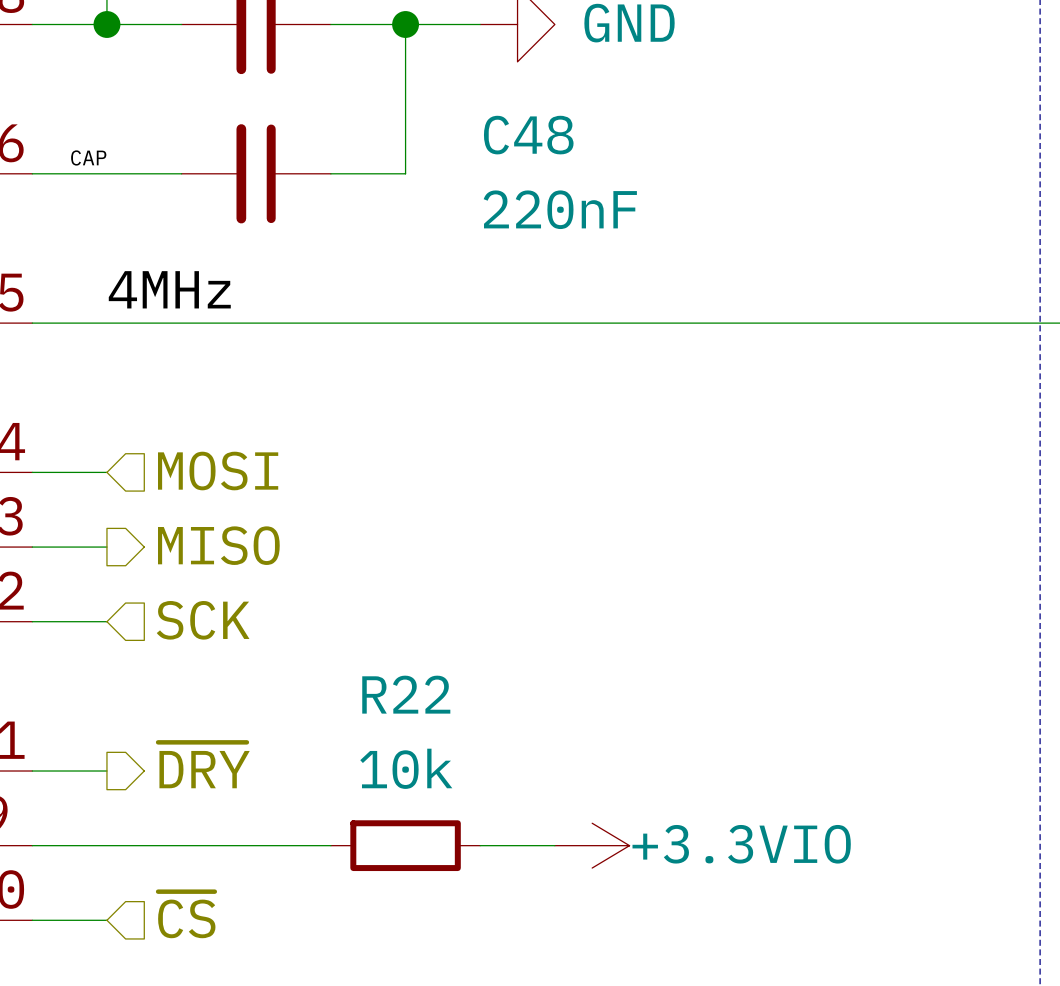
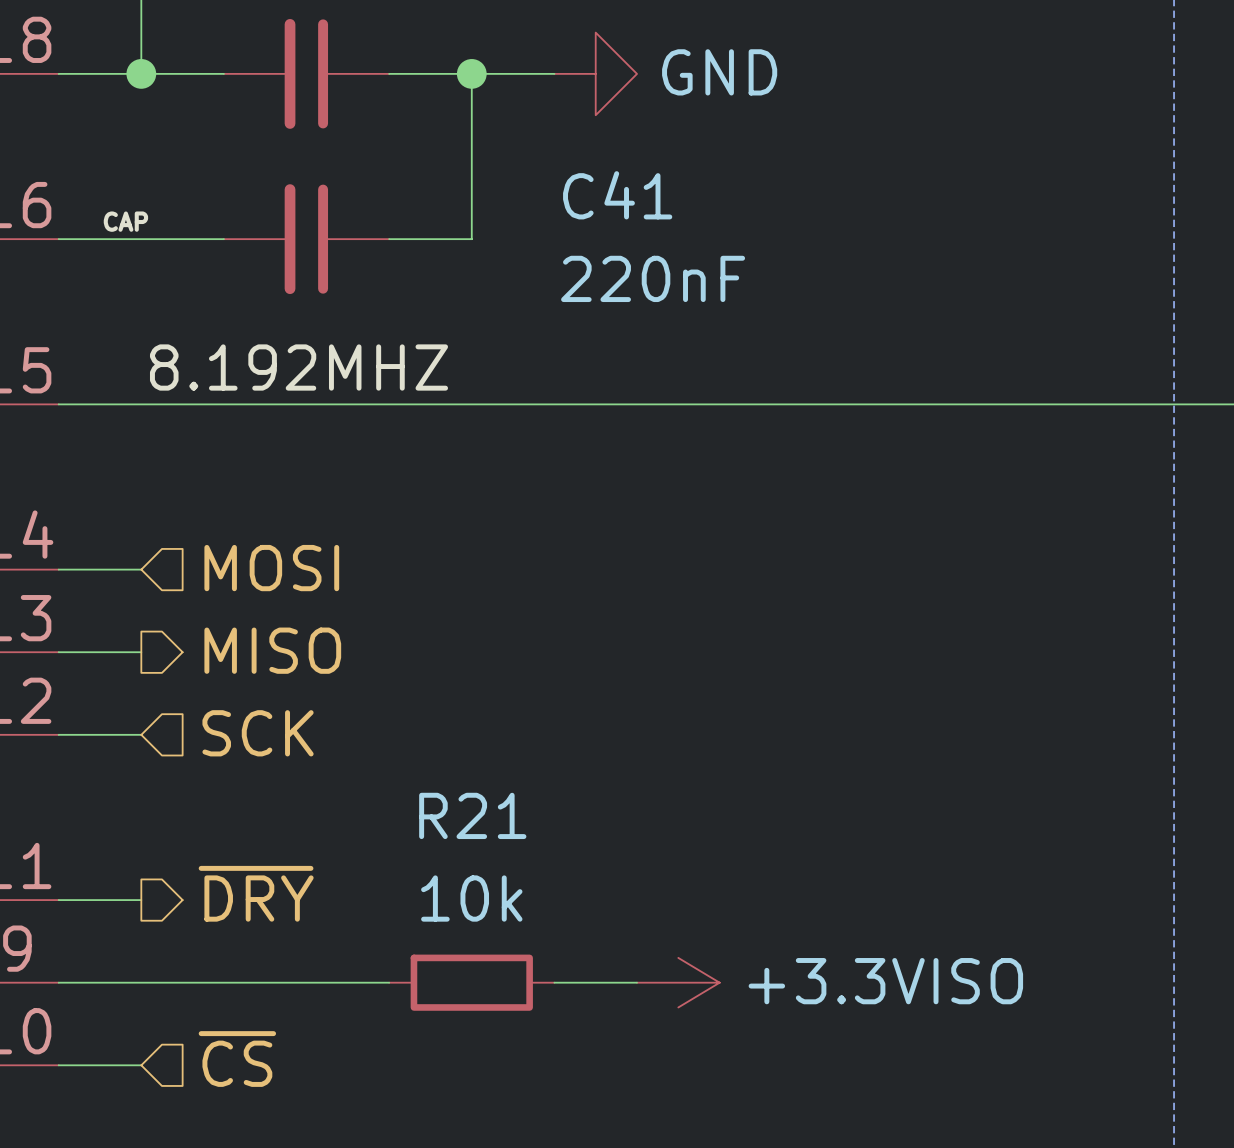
C48 name: C48 (528, 135) -> C41 (617, 195)
label: 4MHz (169, 289) -> 8.192MHZ (299, 367)
R22 name: R22 (406, 694) -> R21 (472, 815)
power symbol: +3.3VIO (592, 845) -> +3.3VISO (678, 982)

